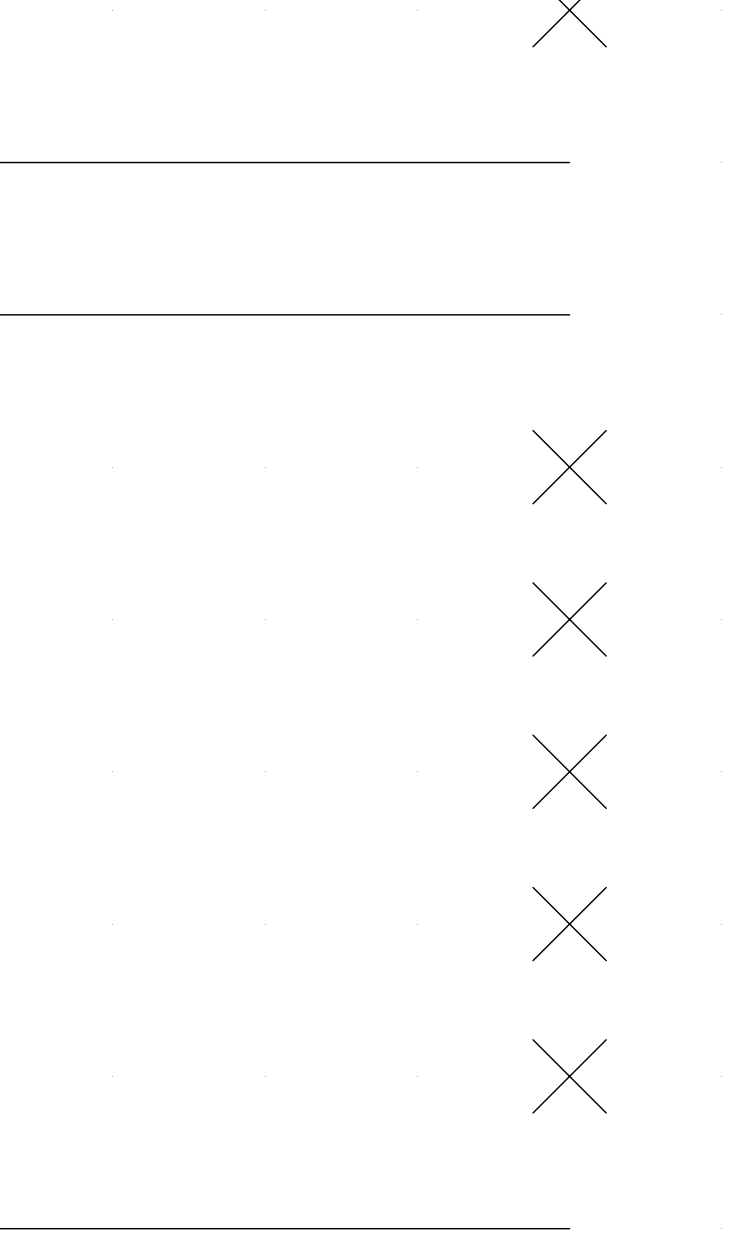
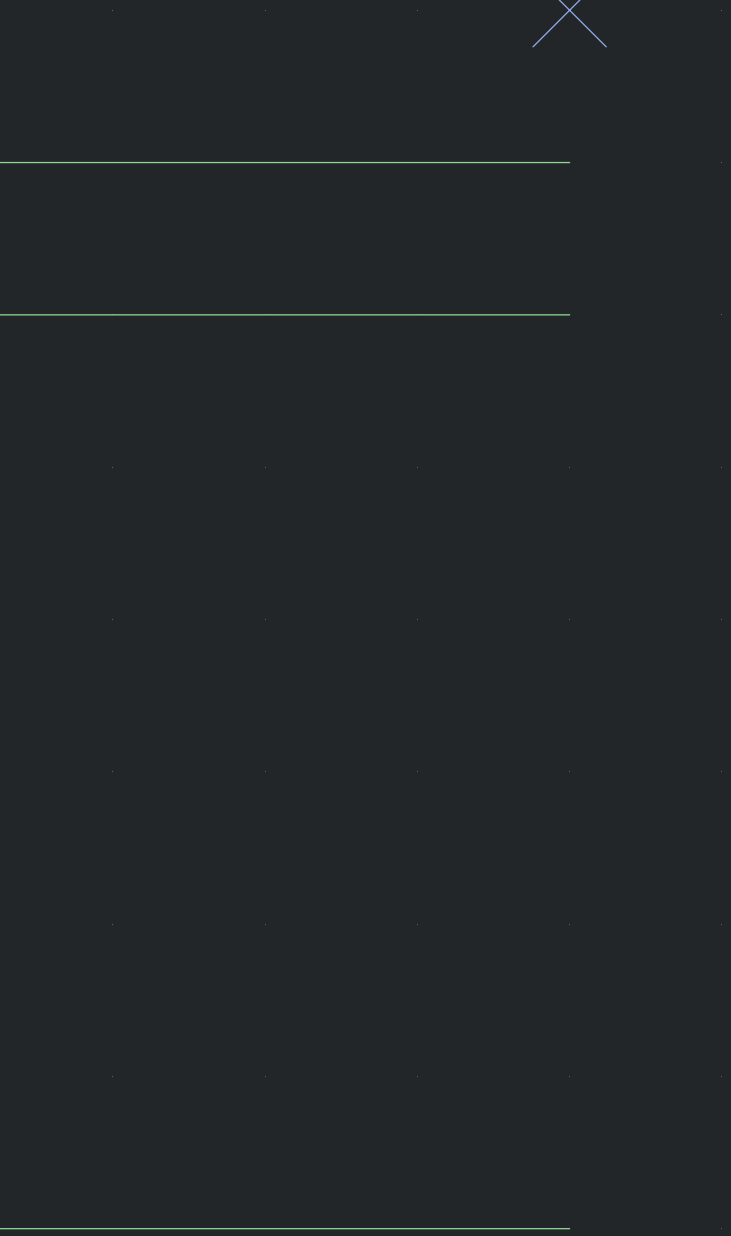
no-connect mark: (569, 467) -> none
no-connect mark: (569, 619) -> none
no-connect mark: (569, 771) -> none
no-connect mark: (569, 924) -> none
no-connect mark: (569, 1076) -> none

